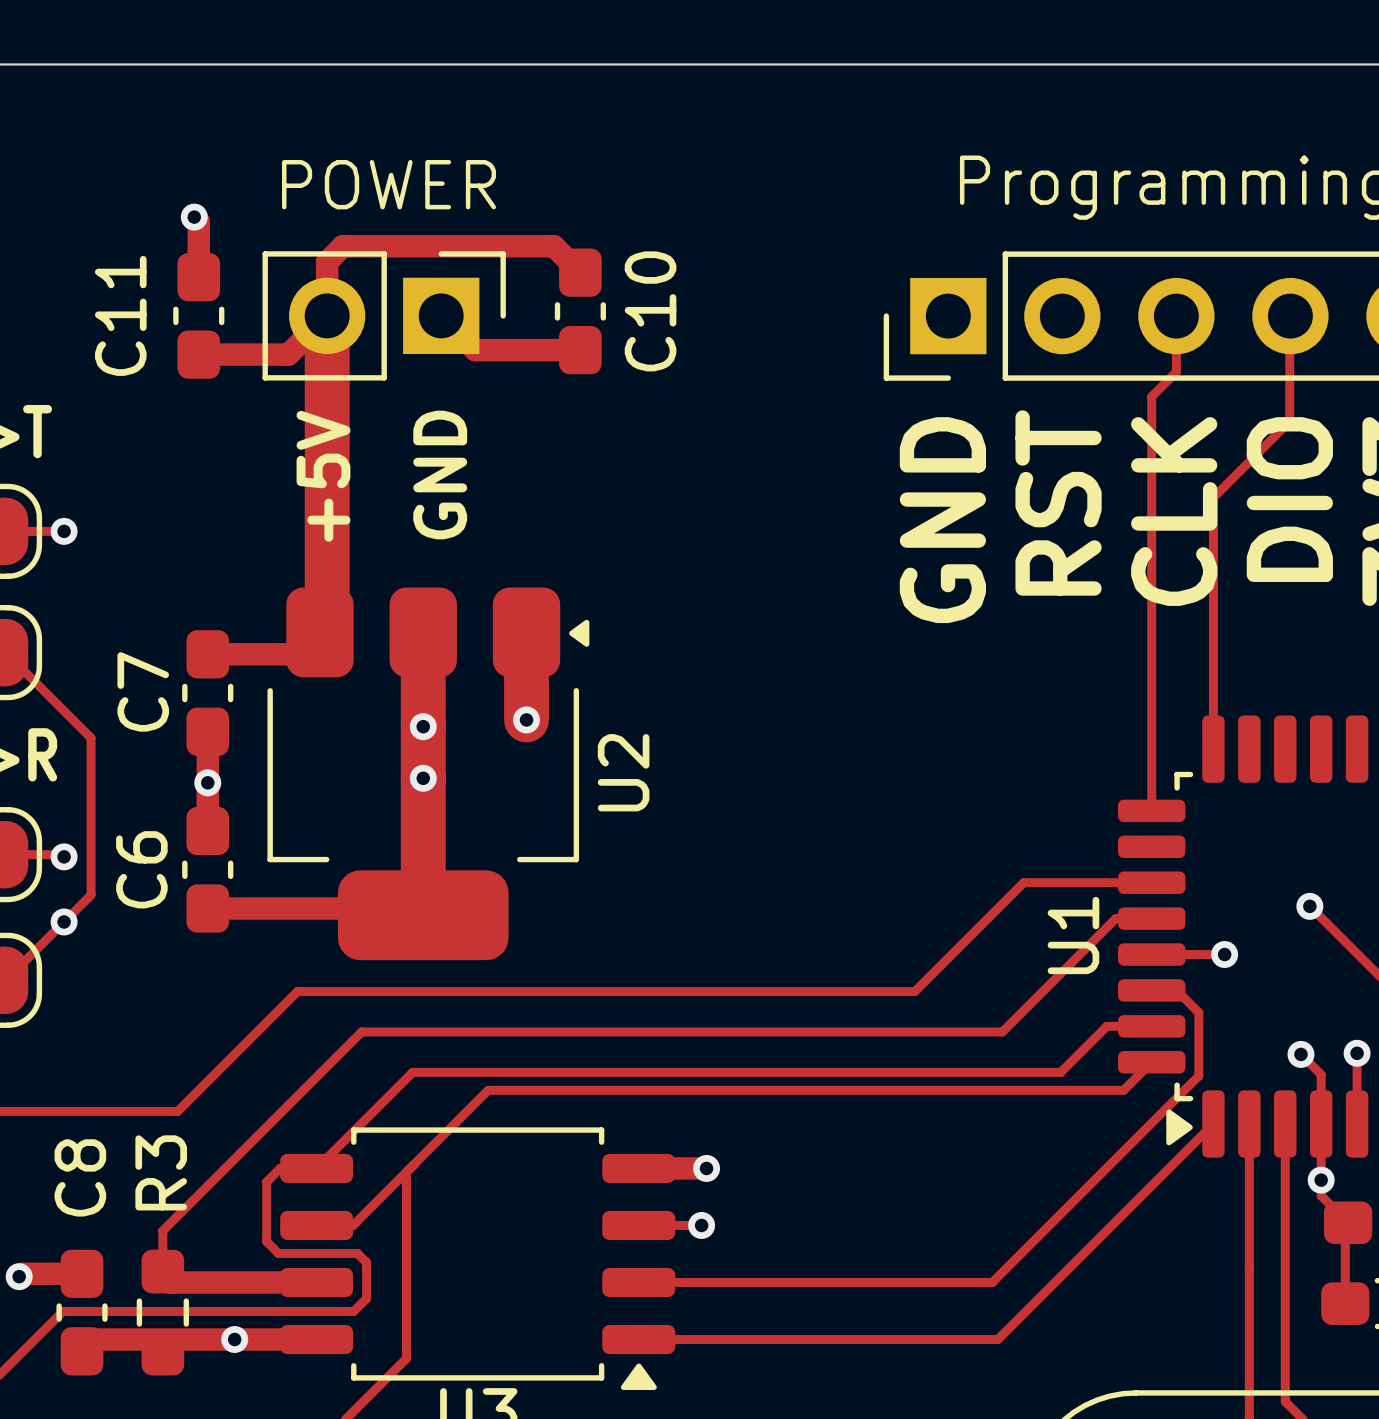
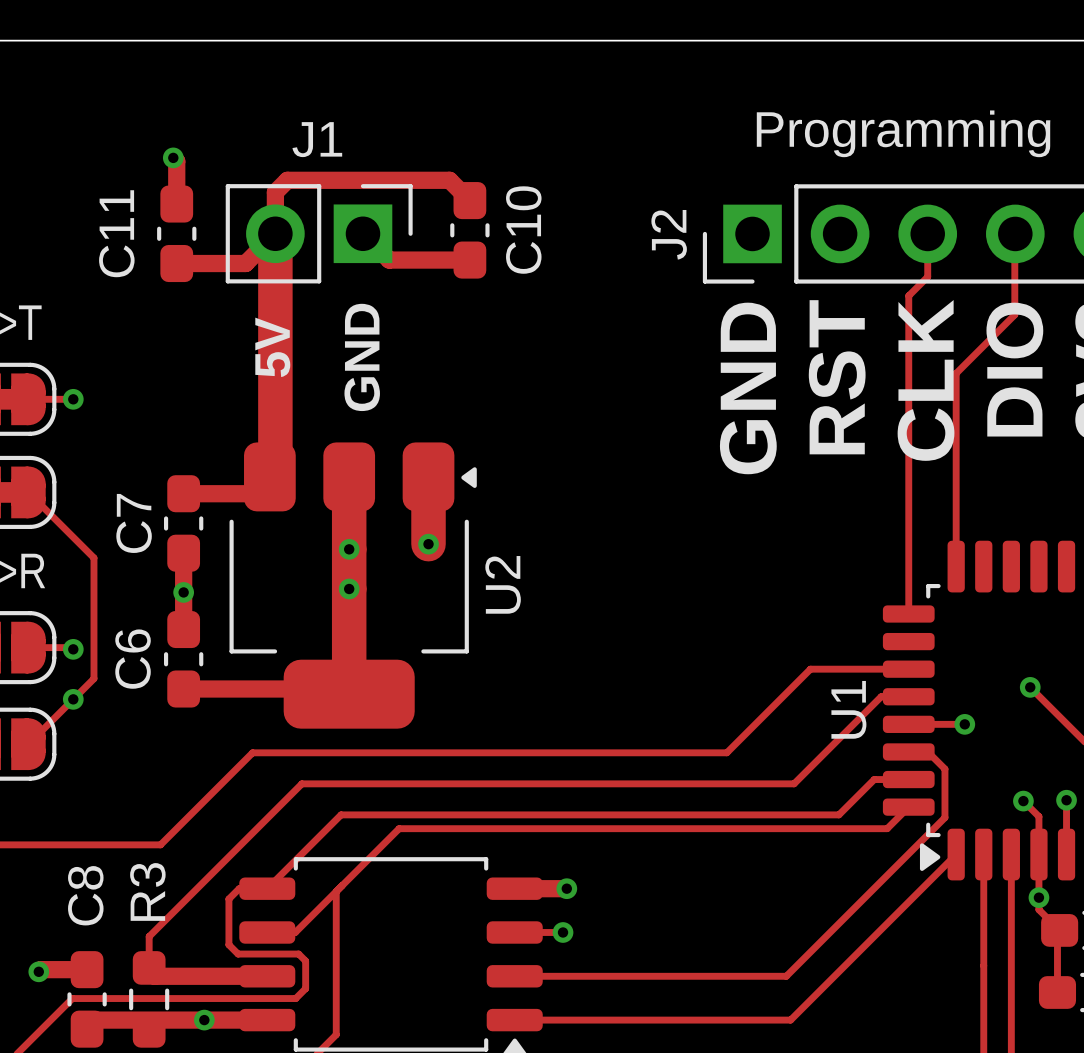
text: POWER (389, 184) -> none
J1 name: none -> J1 (317, 139)
J2 name: none -> J2 (669, 234)
text: +5V (323, 476) -> 5V (272, 347)

